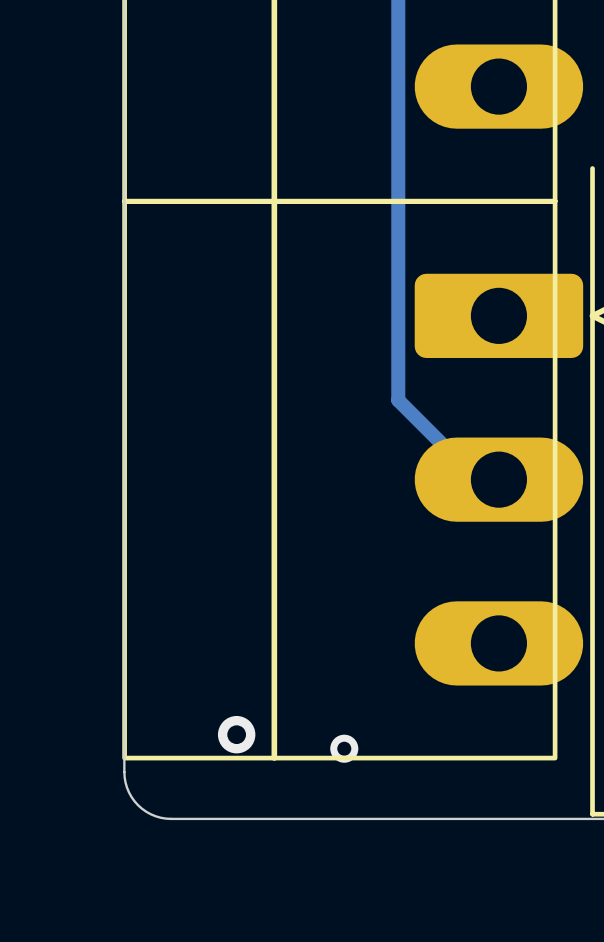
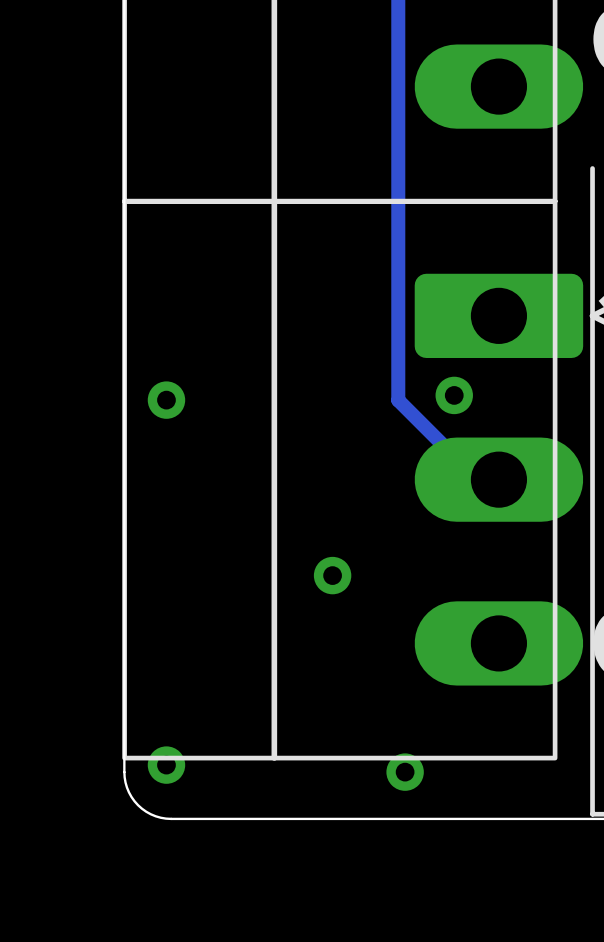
via: none -> (454, 395)
via: none -> (166, 400)
via: none -> (332, 575)
via position: (236, 734) -> (166, 765)
via: (344, 748) -> none
via: none -> (405, 772)

